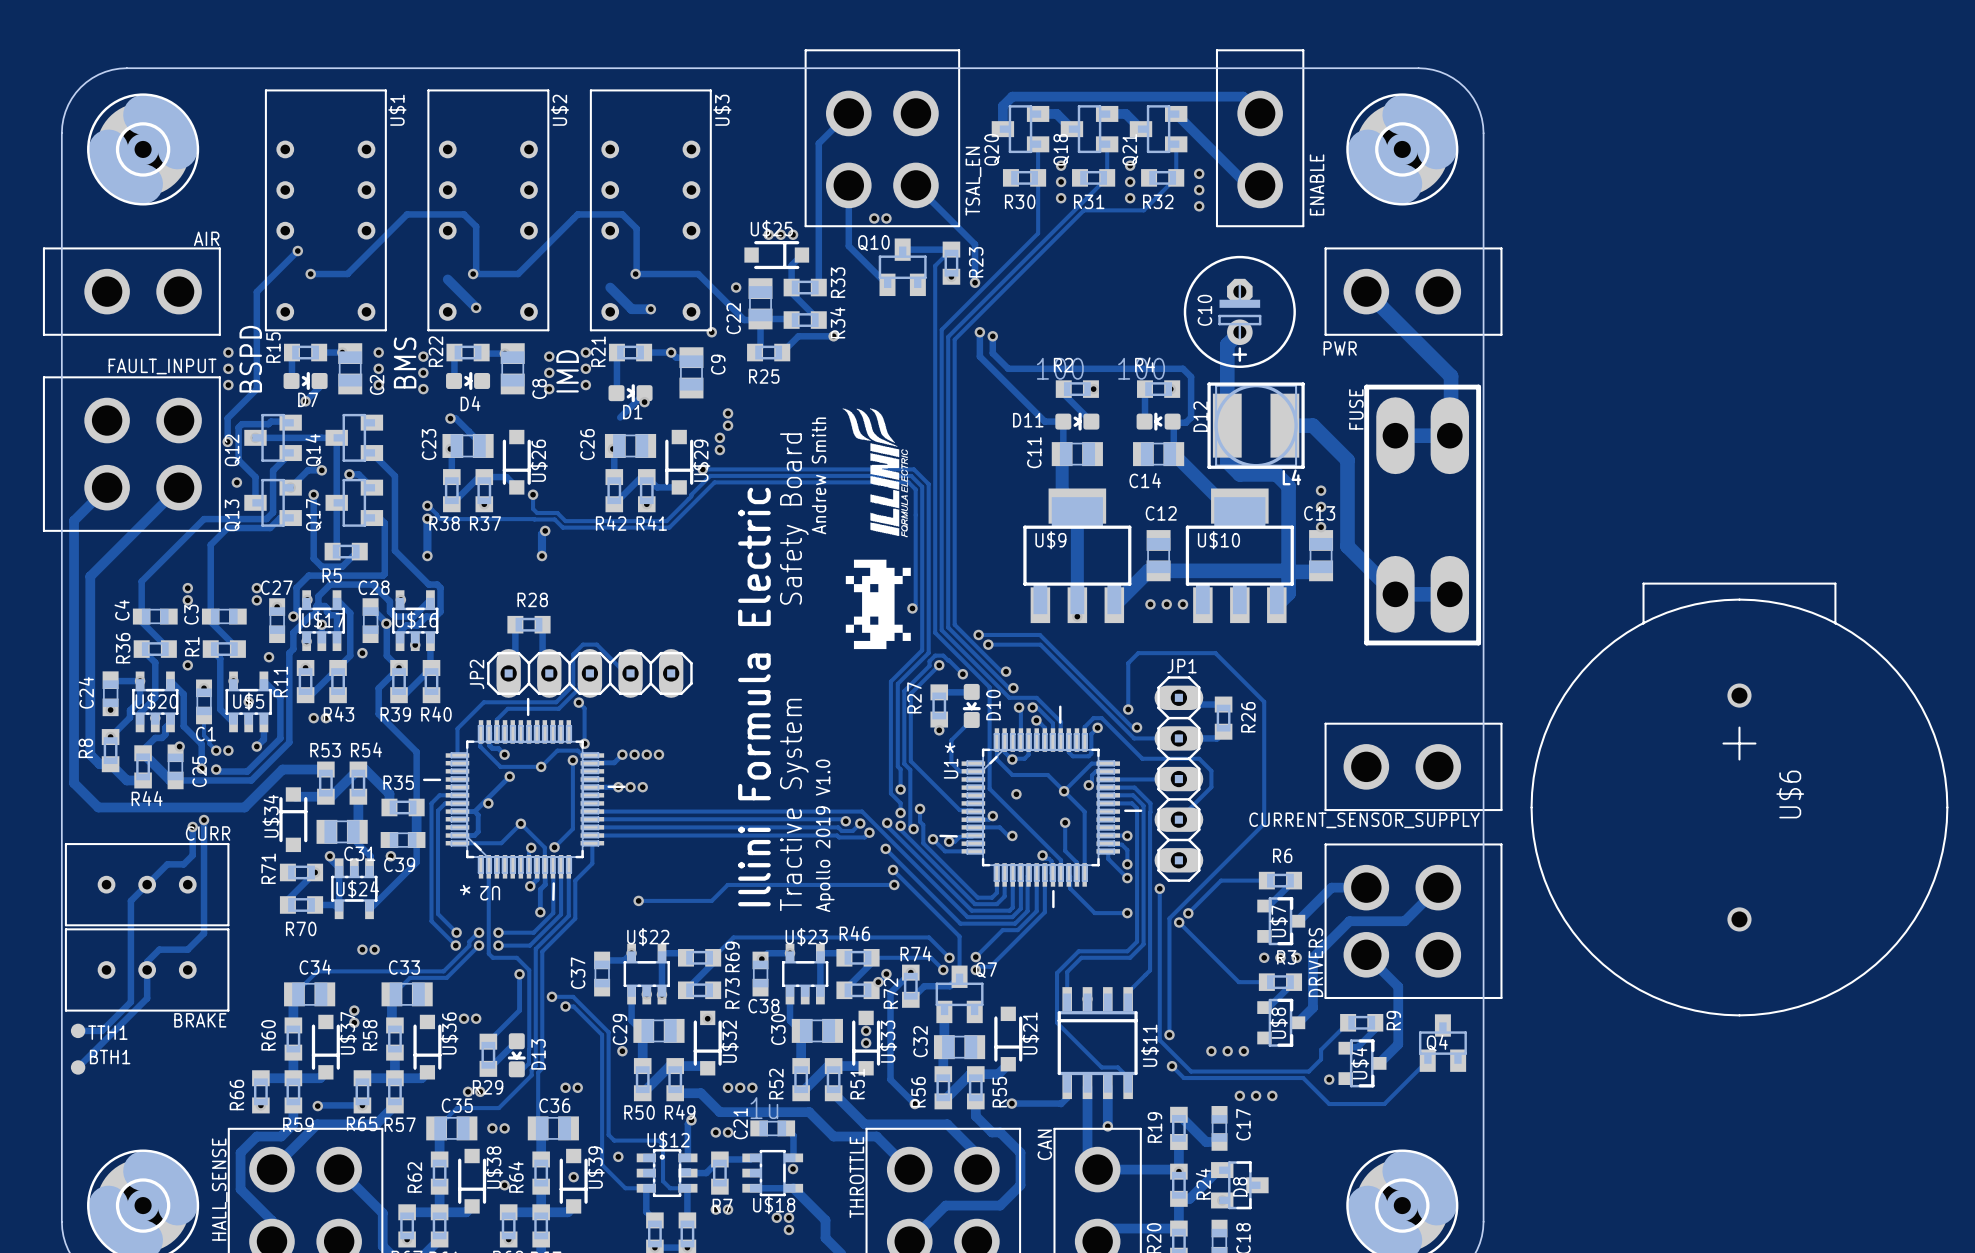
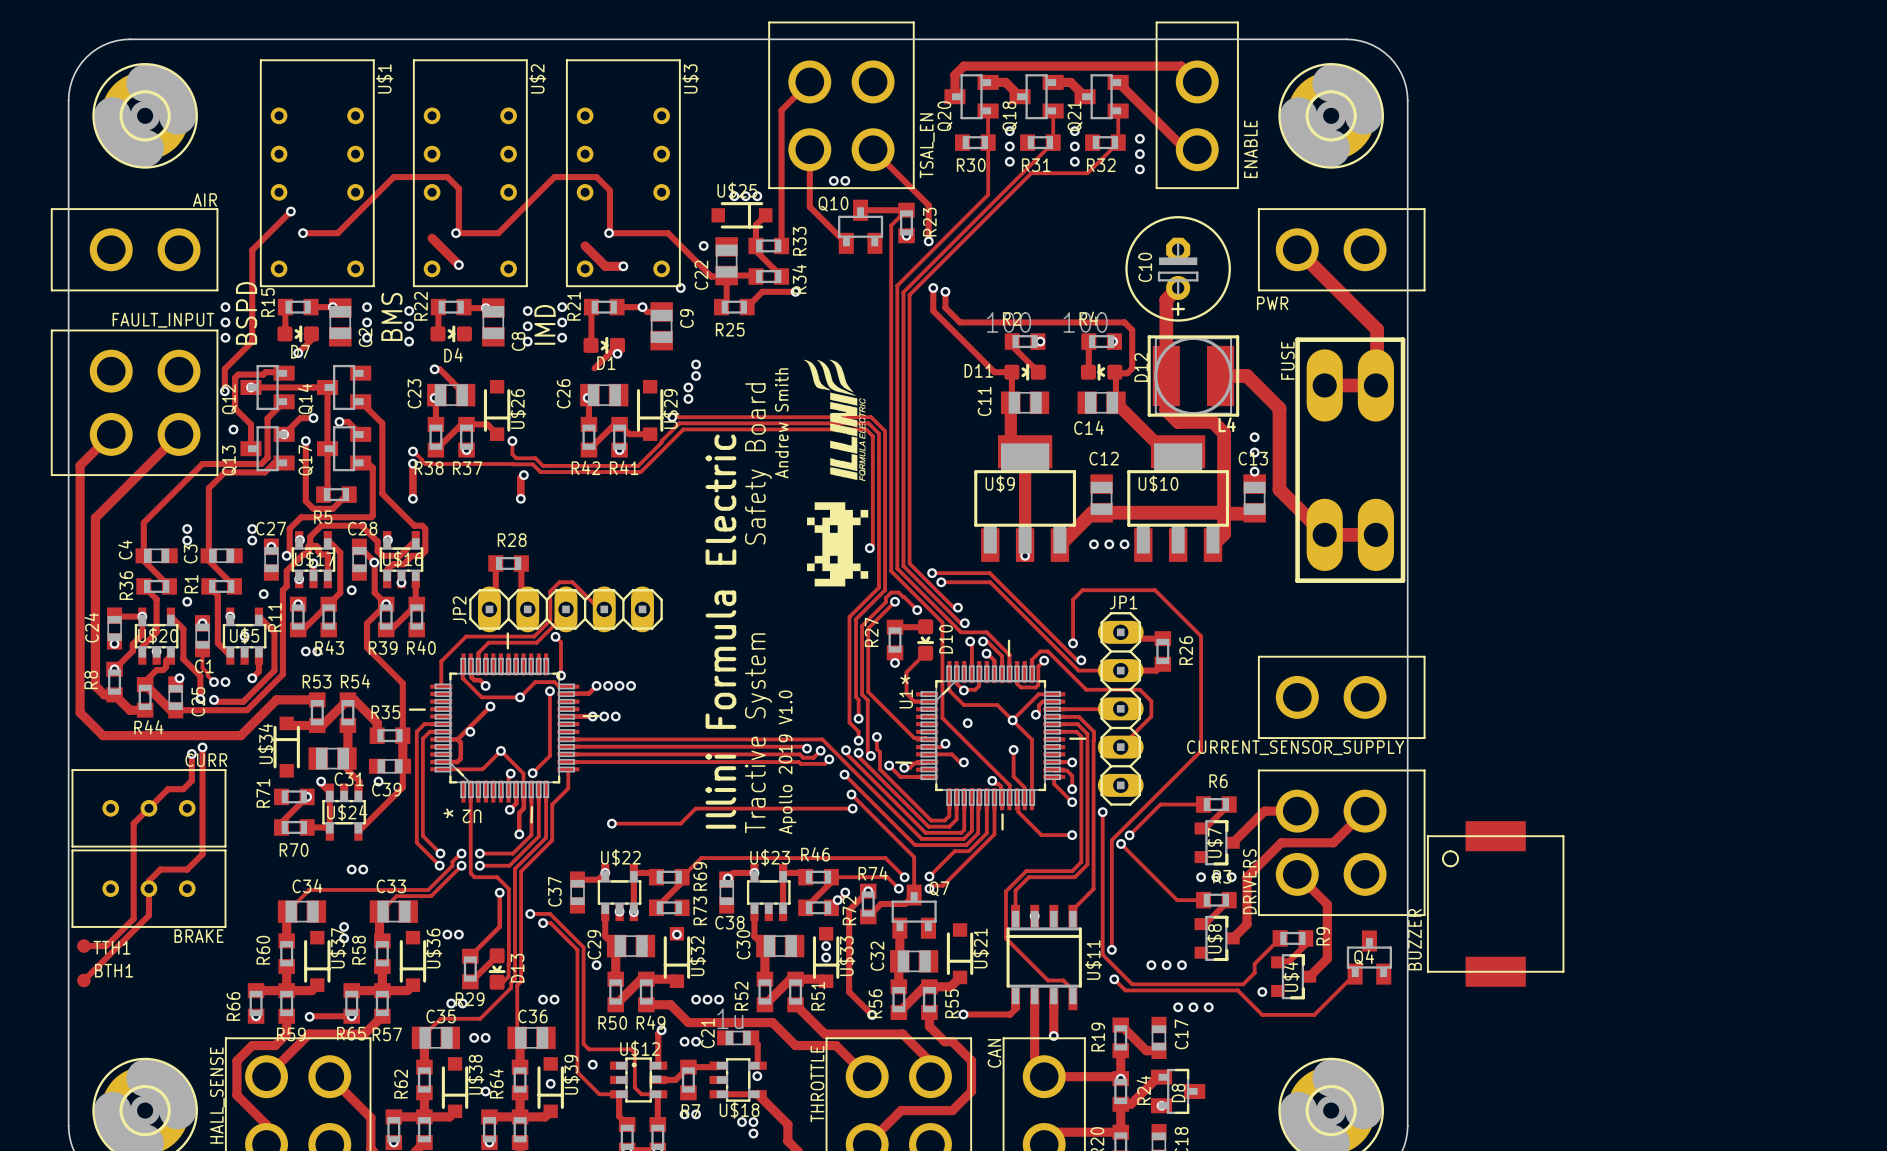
U$6: (1739, 799) -> none
BUZZER: none -> (1495, 903)

